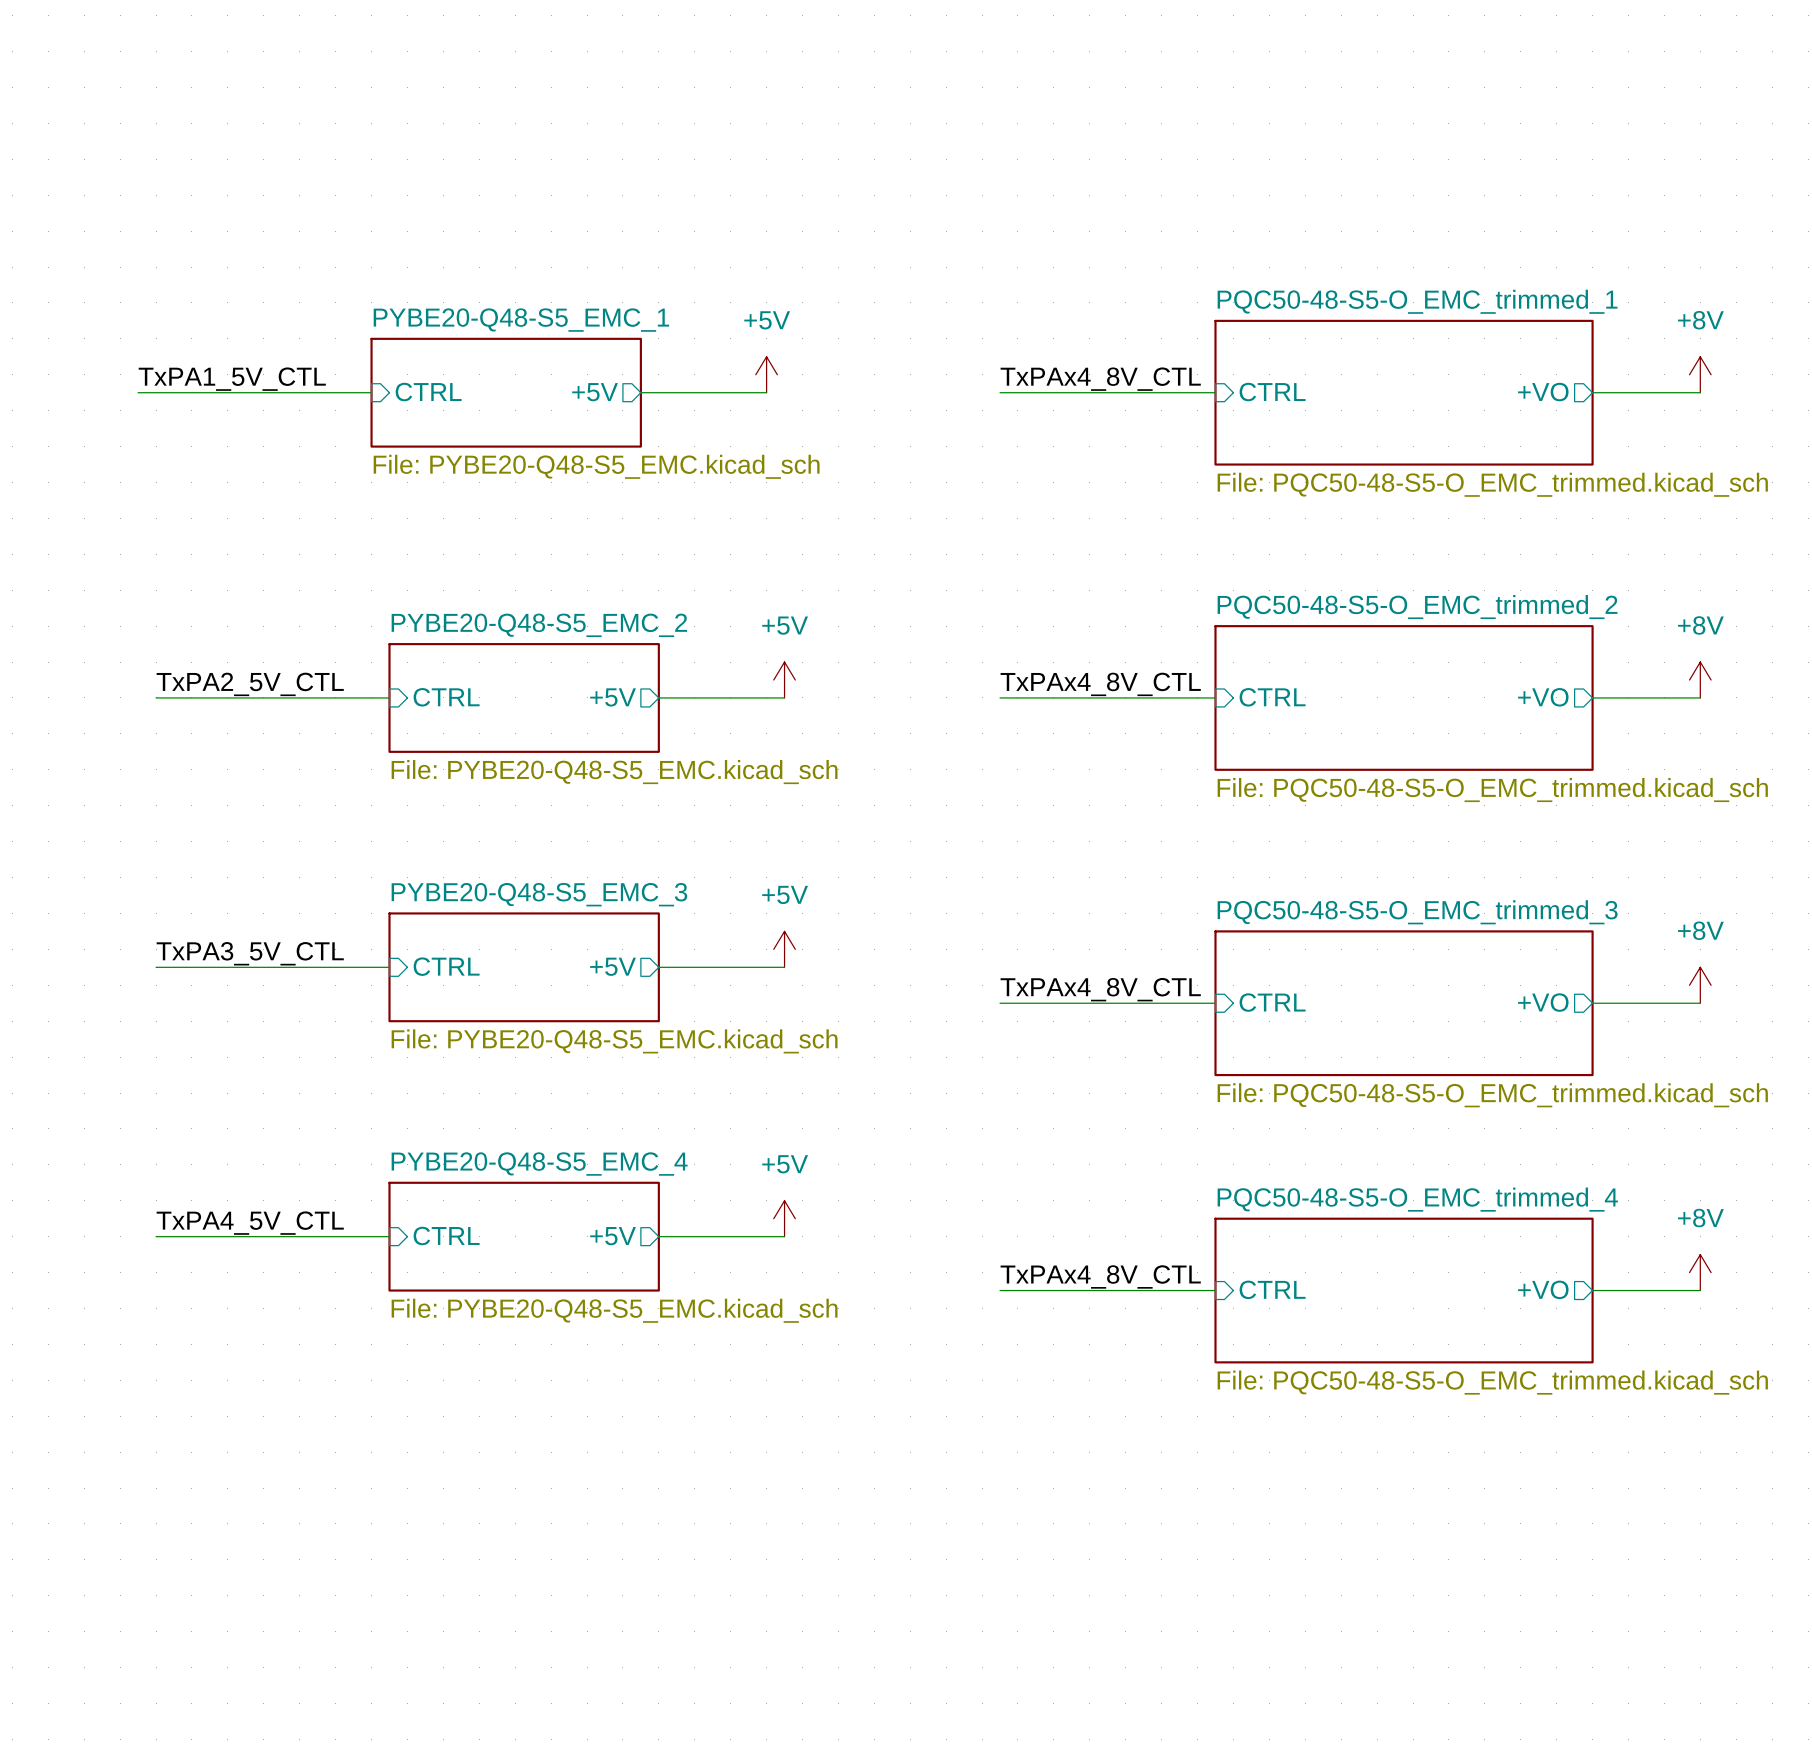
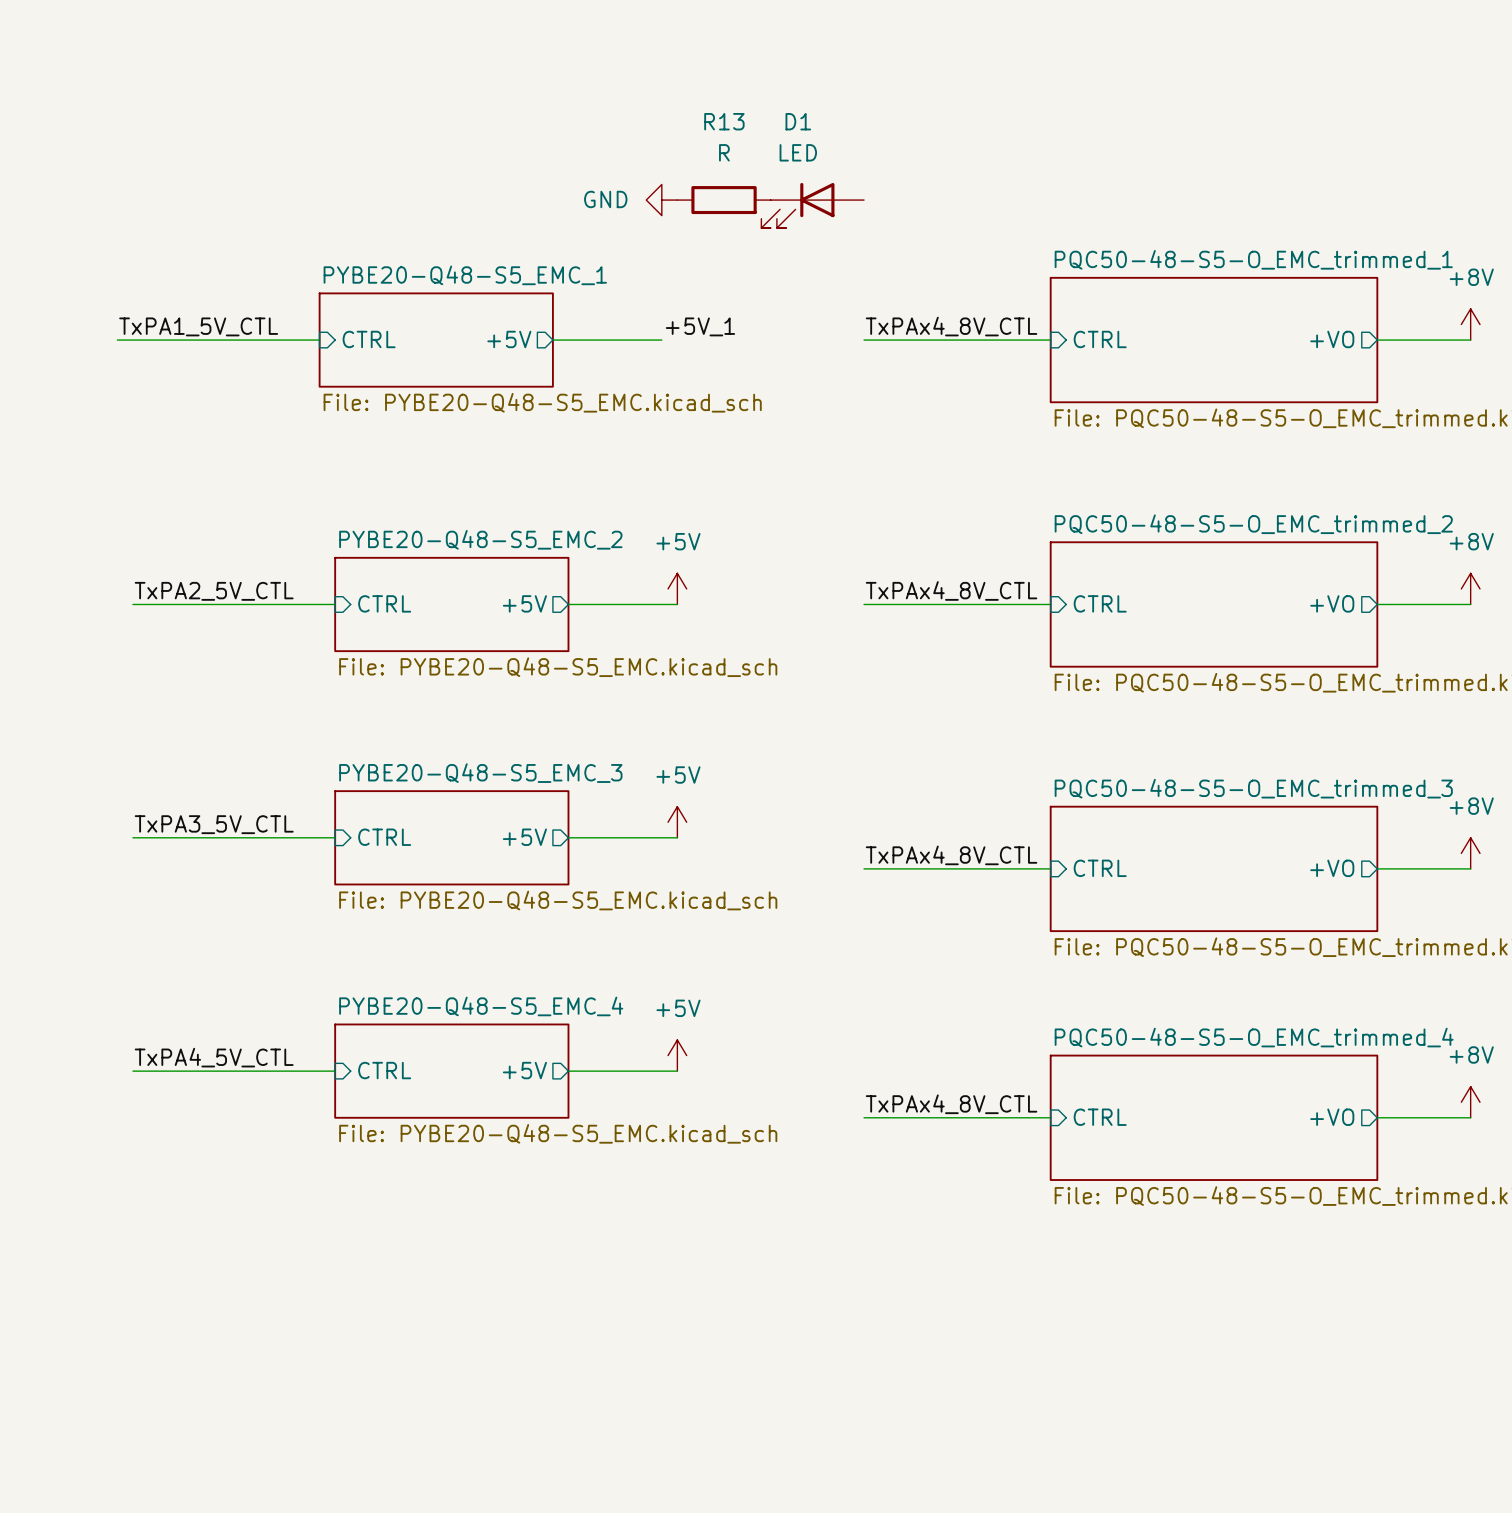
power symbol: none -> GND (661, 200)
R13: none -> R (724, 200)
D1: none -> LED (812, 205)
power symbol: +5V (766, 374) -> none
label: none -> +5V_1 (700, 326)

